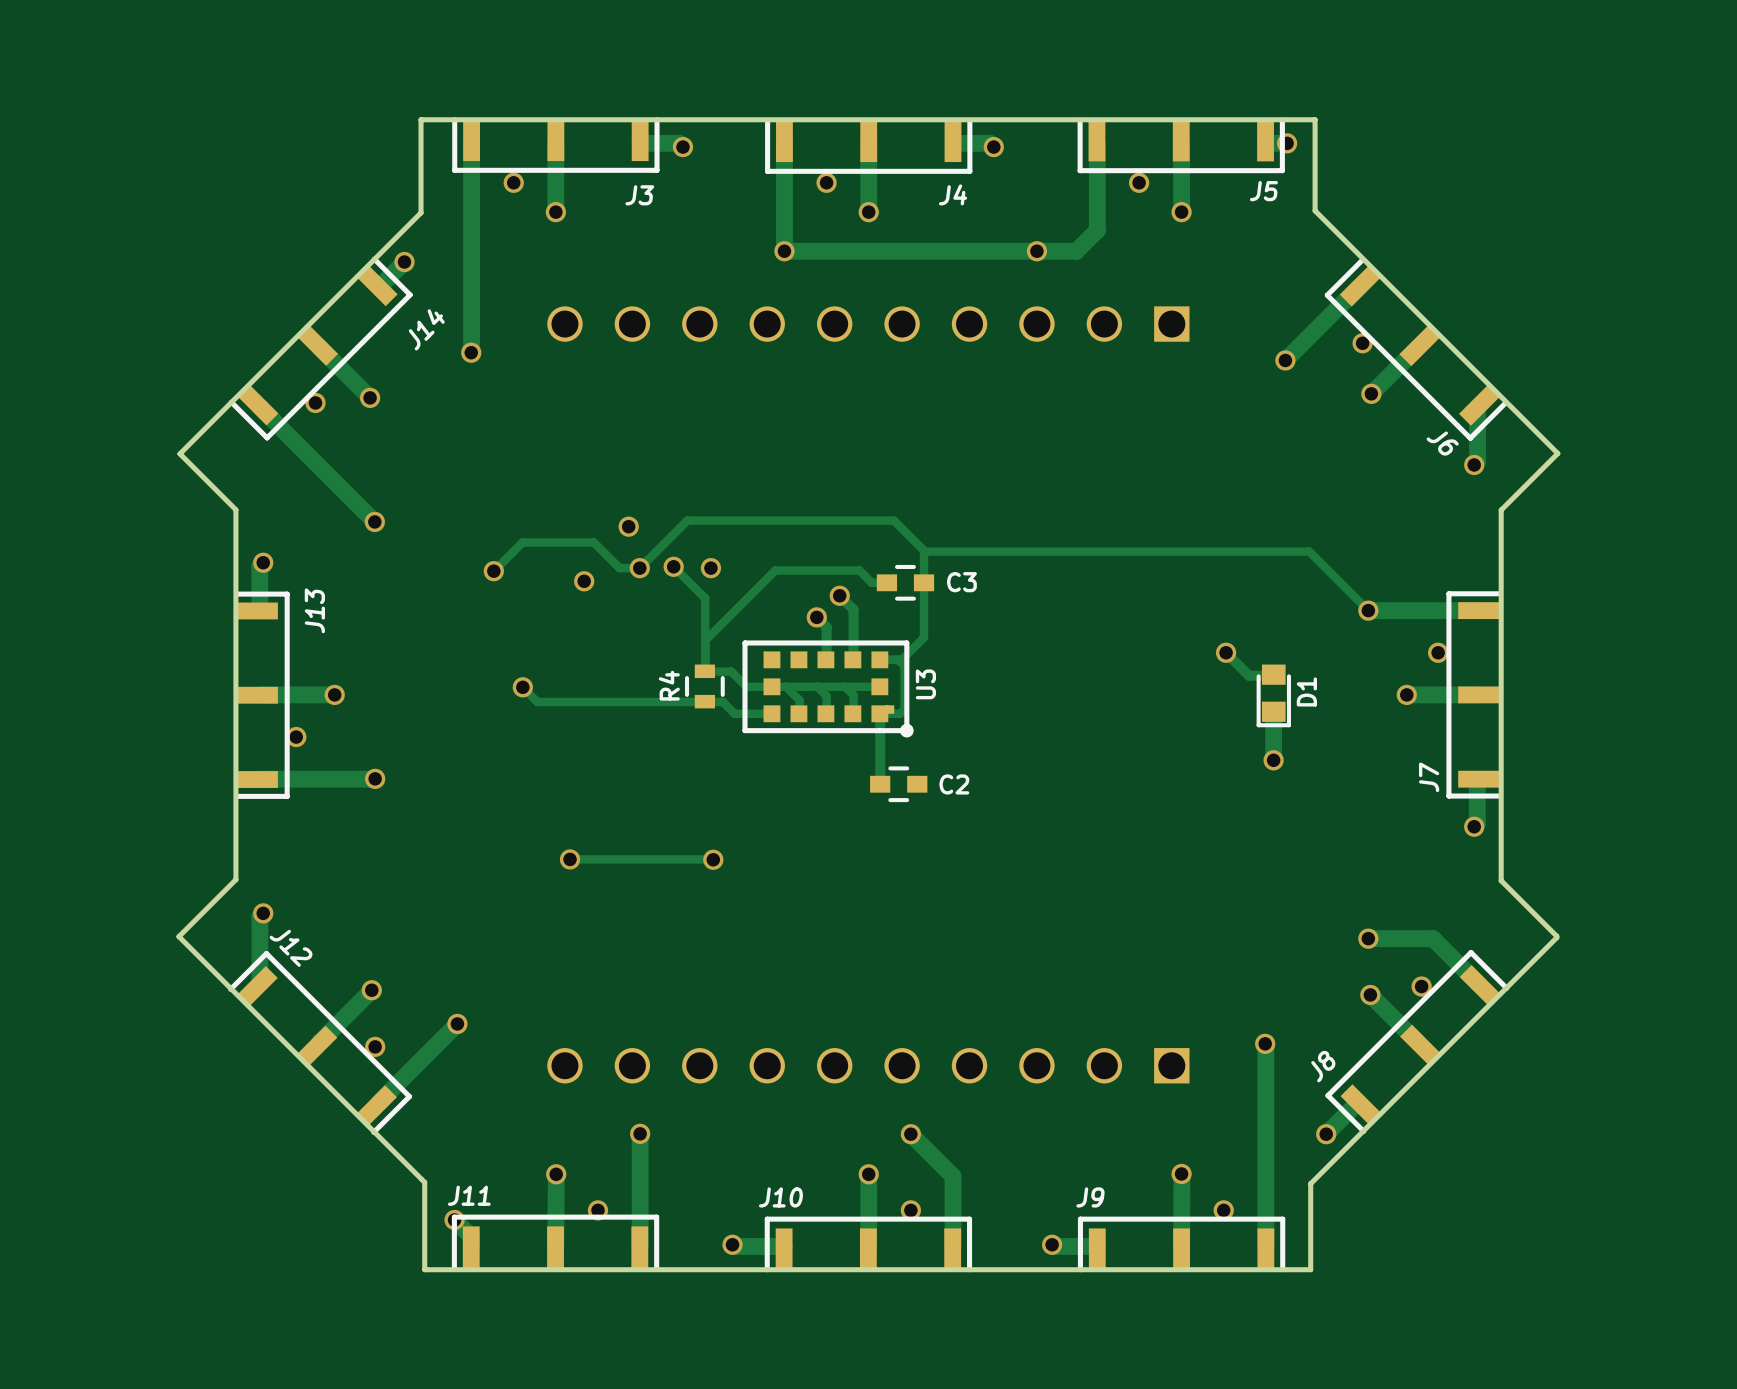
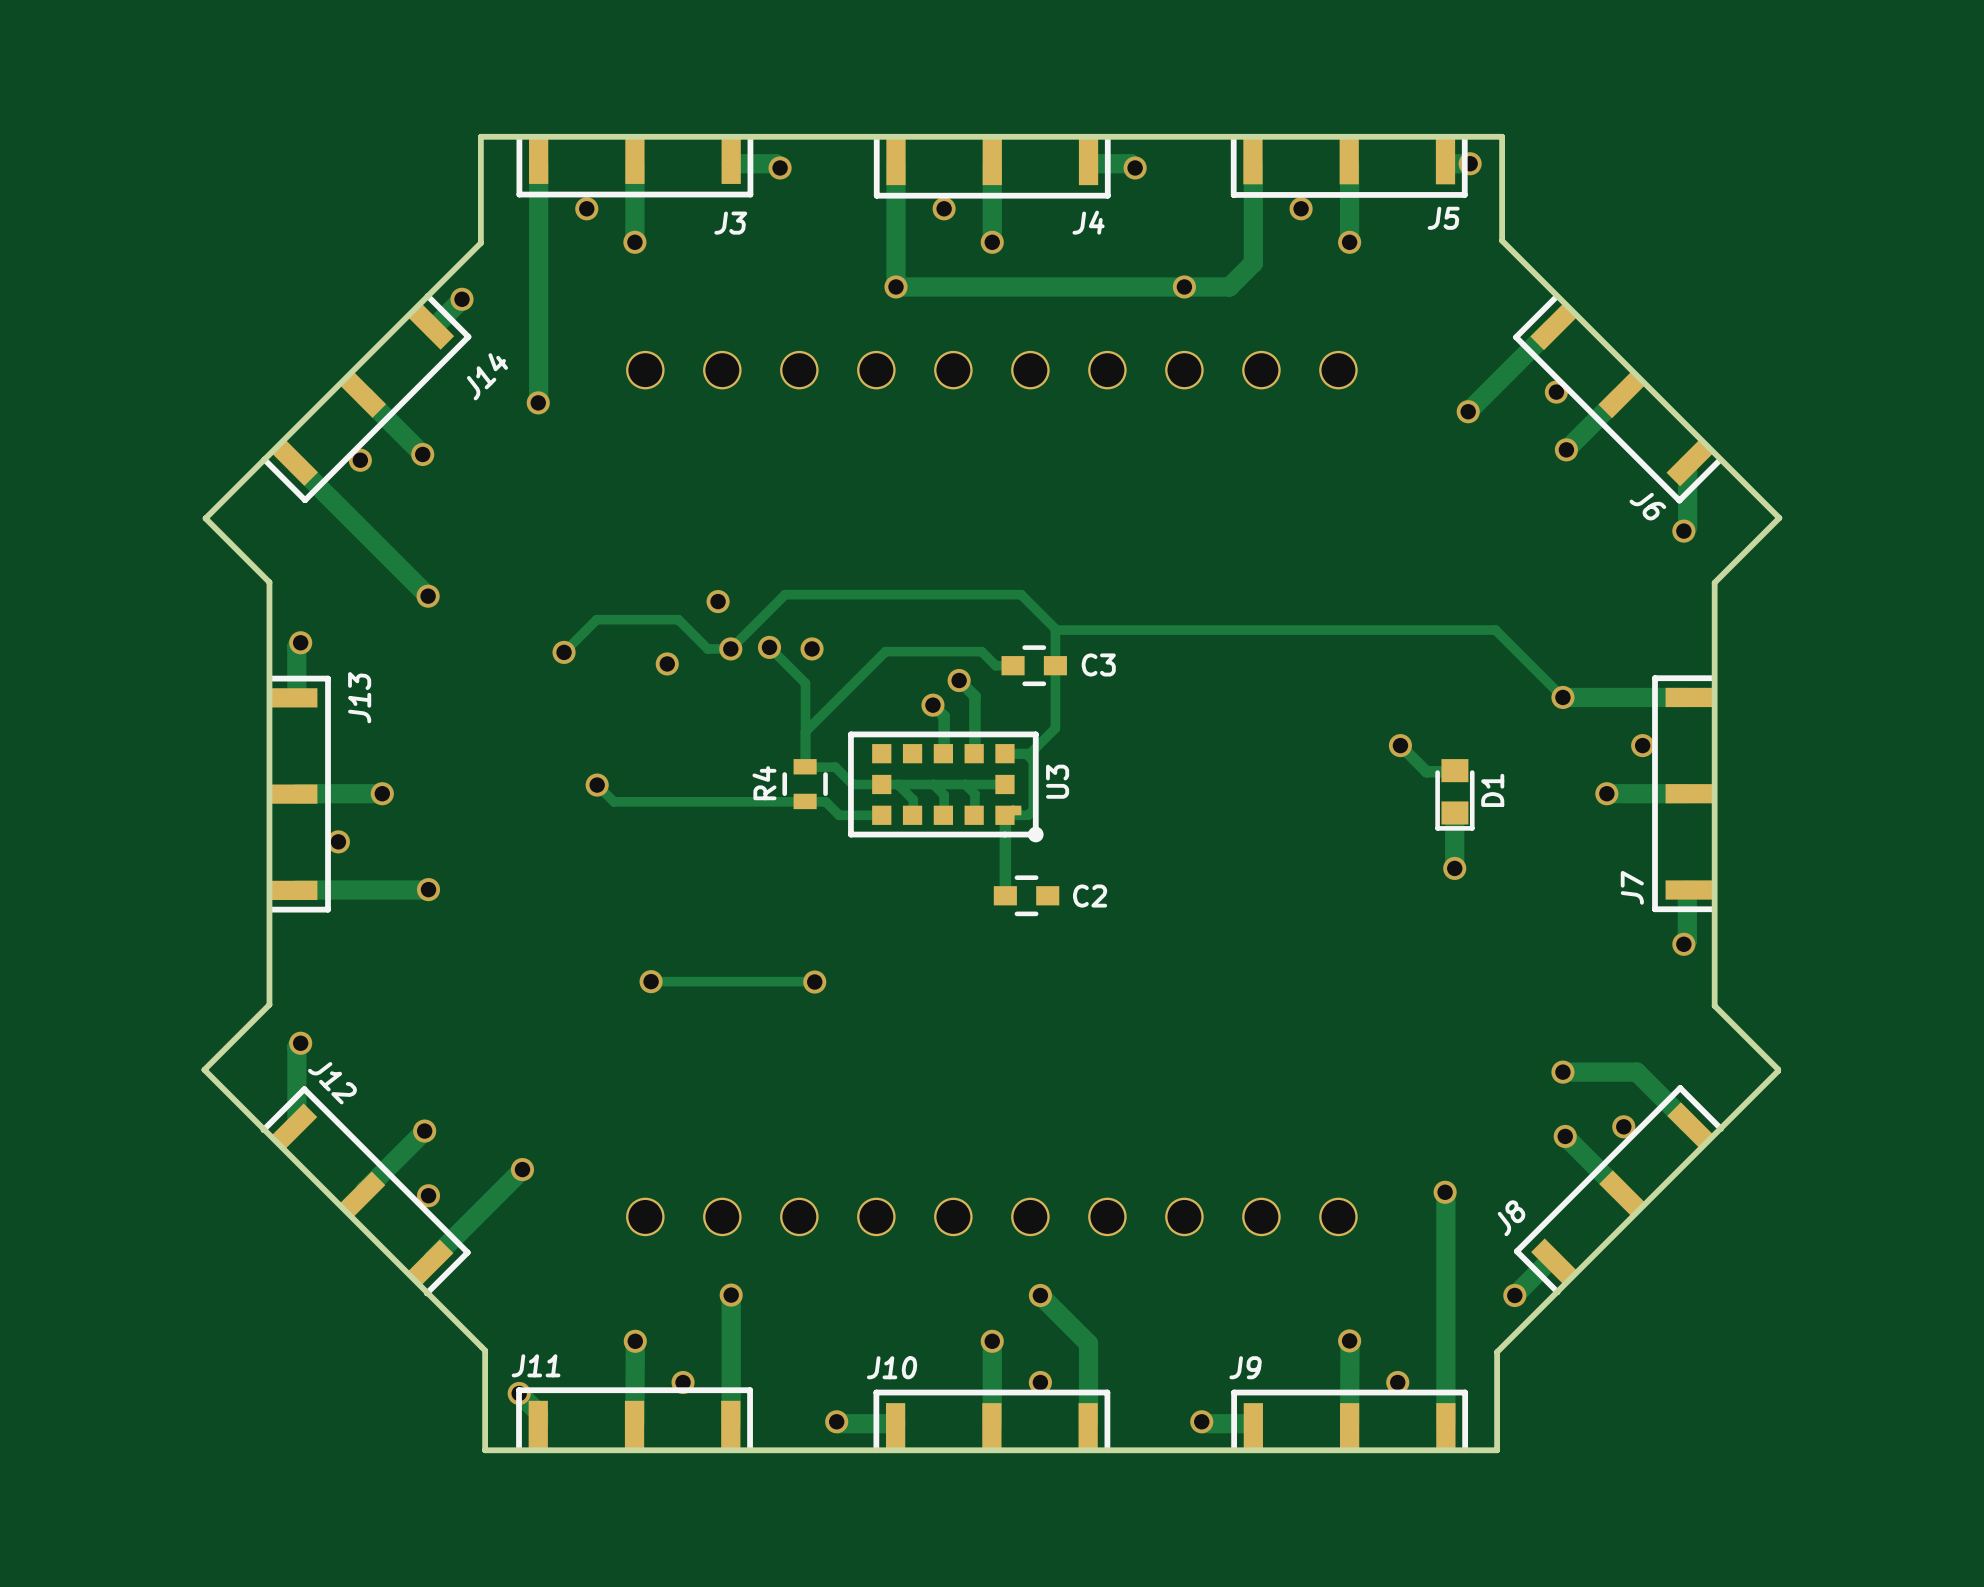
part footprint: [547, 306, 1190, 342] -> [626, 350, 1358, 390]
part footprint: [547, 1048, 1190, 1084] -> [626, 1197, 1358, 1237]

